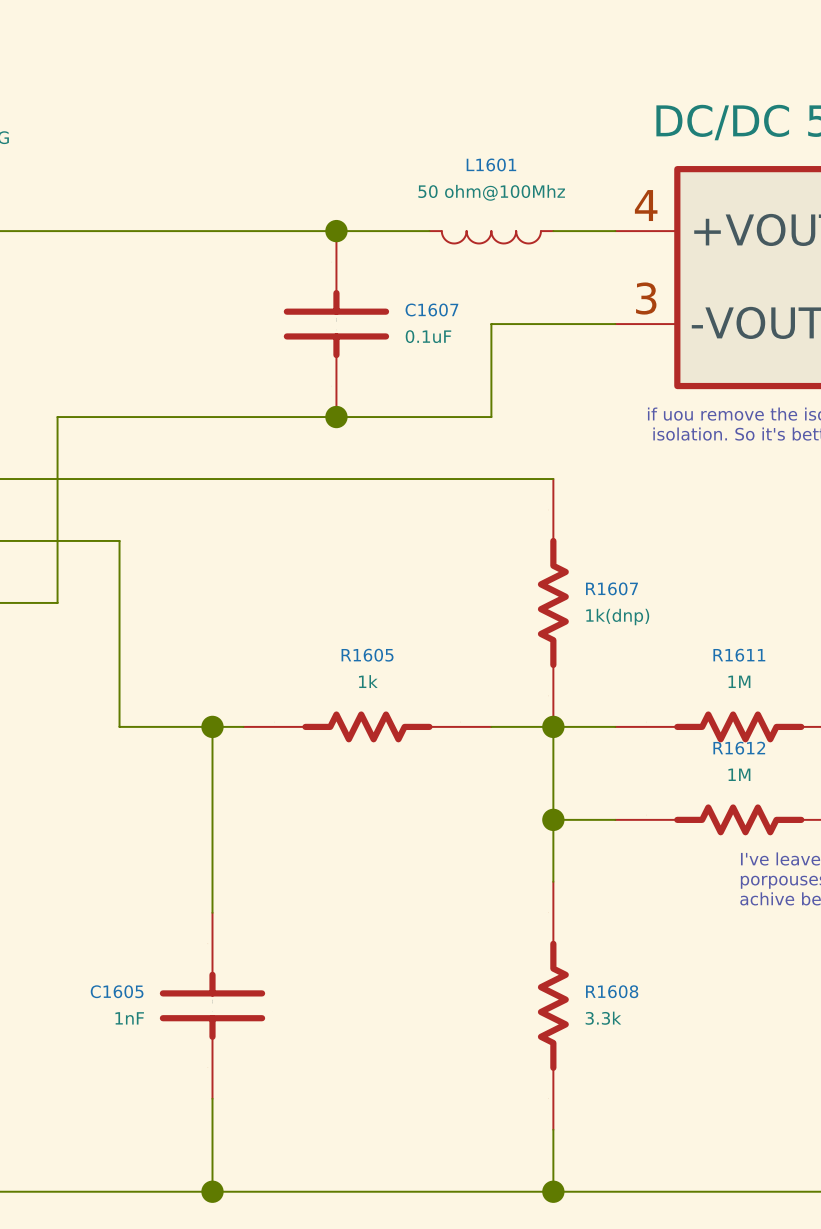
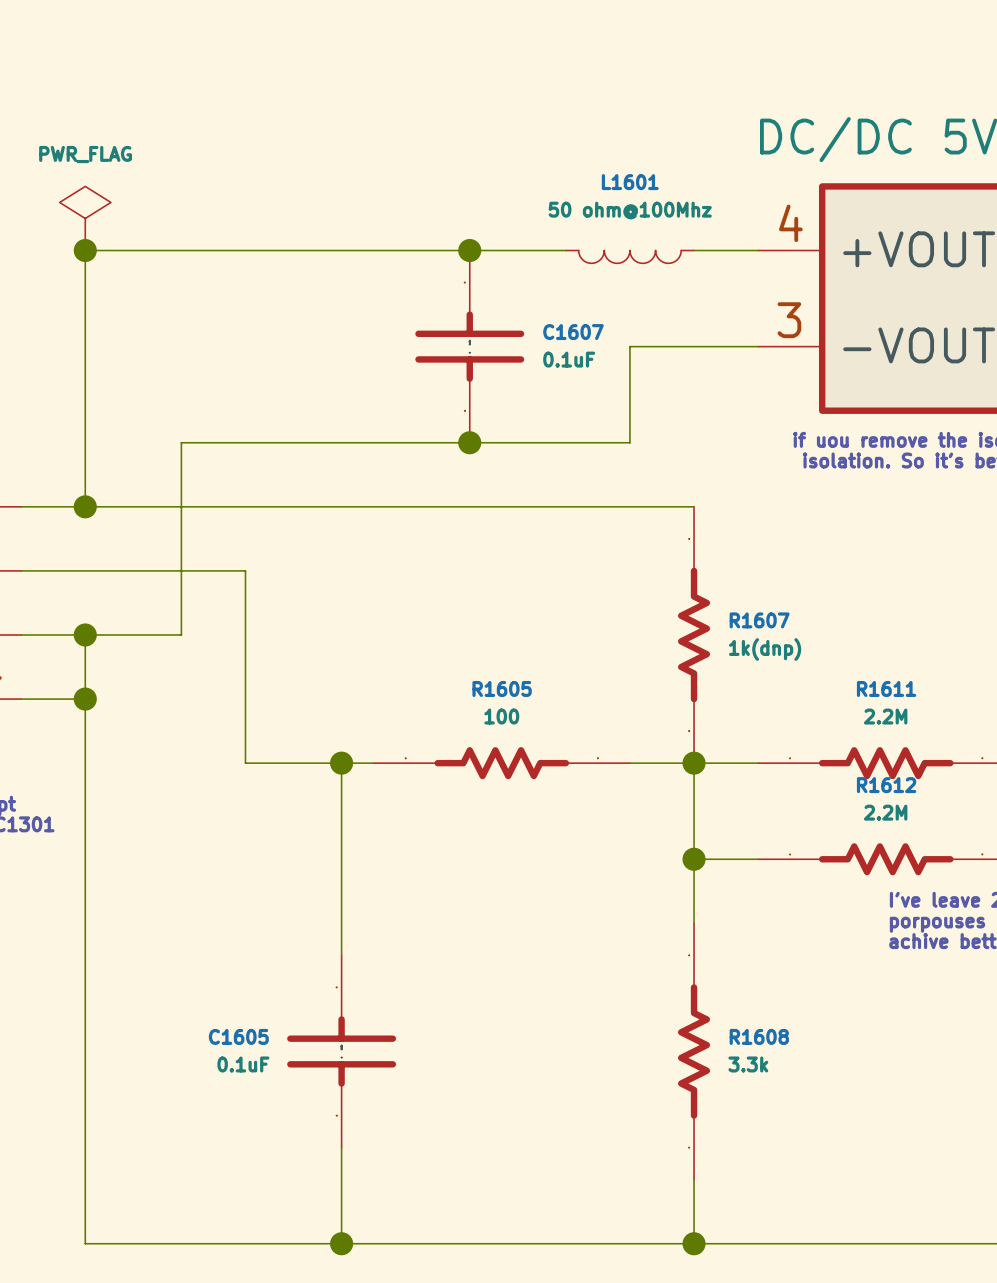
R1605 value: 1k (368, 681) -> 100 (501, 716)
R1611 value: 1M (739, 681) -> 2.2M (885, 716)
R1612 value: 1M (739, 774) -> 2.2M (885, 812)
C1605 value: 1nF (129, 1018) -> 0.1uF (243, 1064)

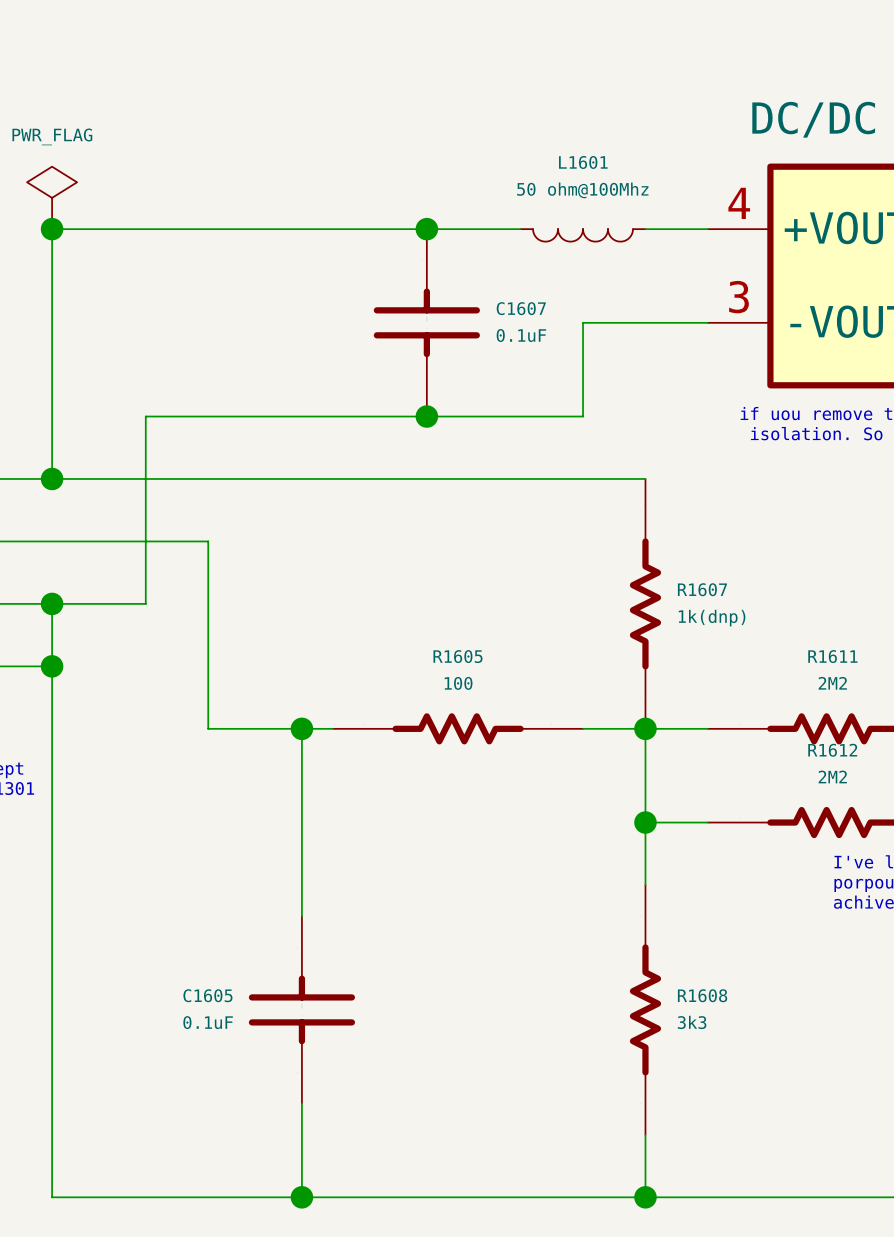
R1611 value: 2.2M (885, 716) -> 2M2 (832, 683)
R1612 value: 2.2M (885, 812) -> 2M2 (832, 776)
R1608 value: 3.3k (748, 1064) -> 3k3 (692, 1022)

